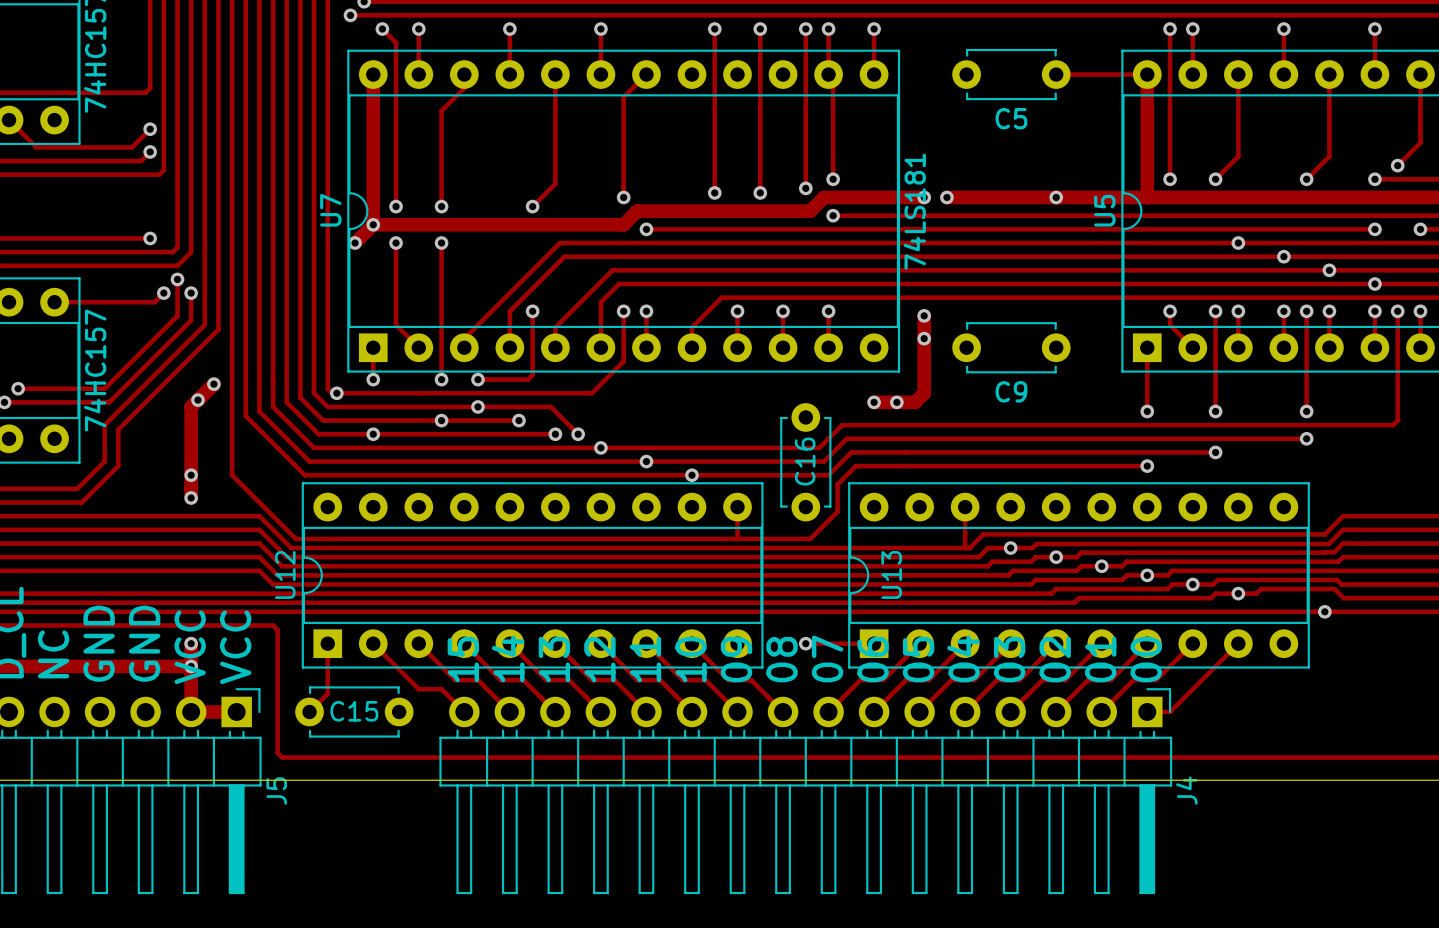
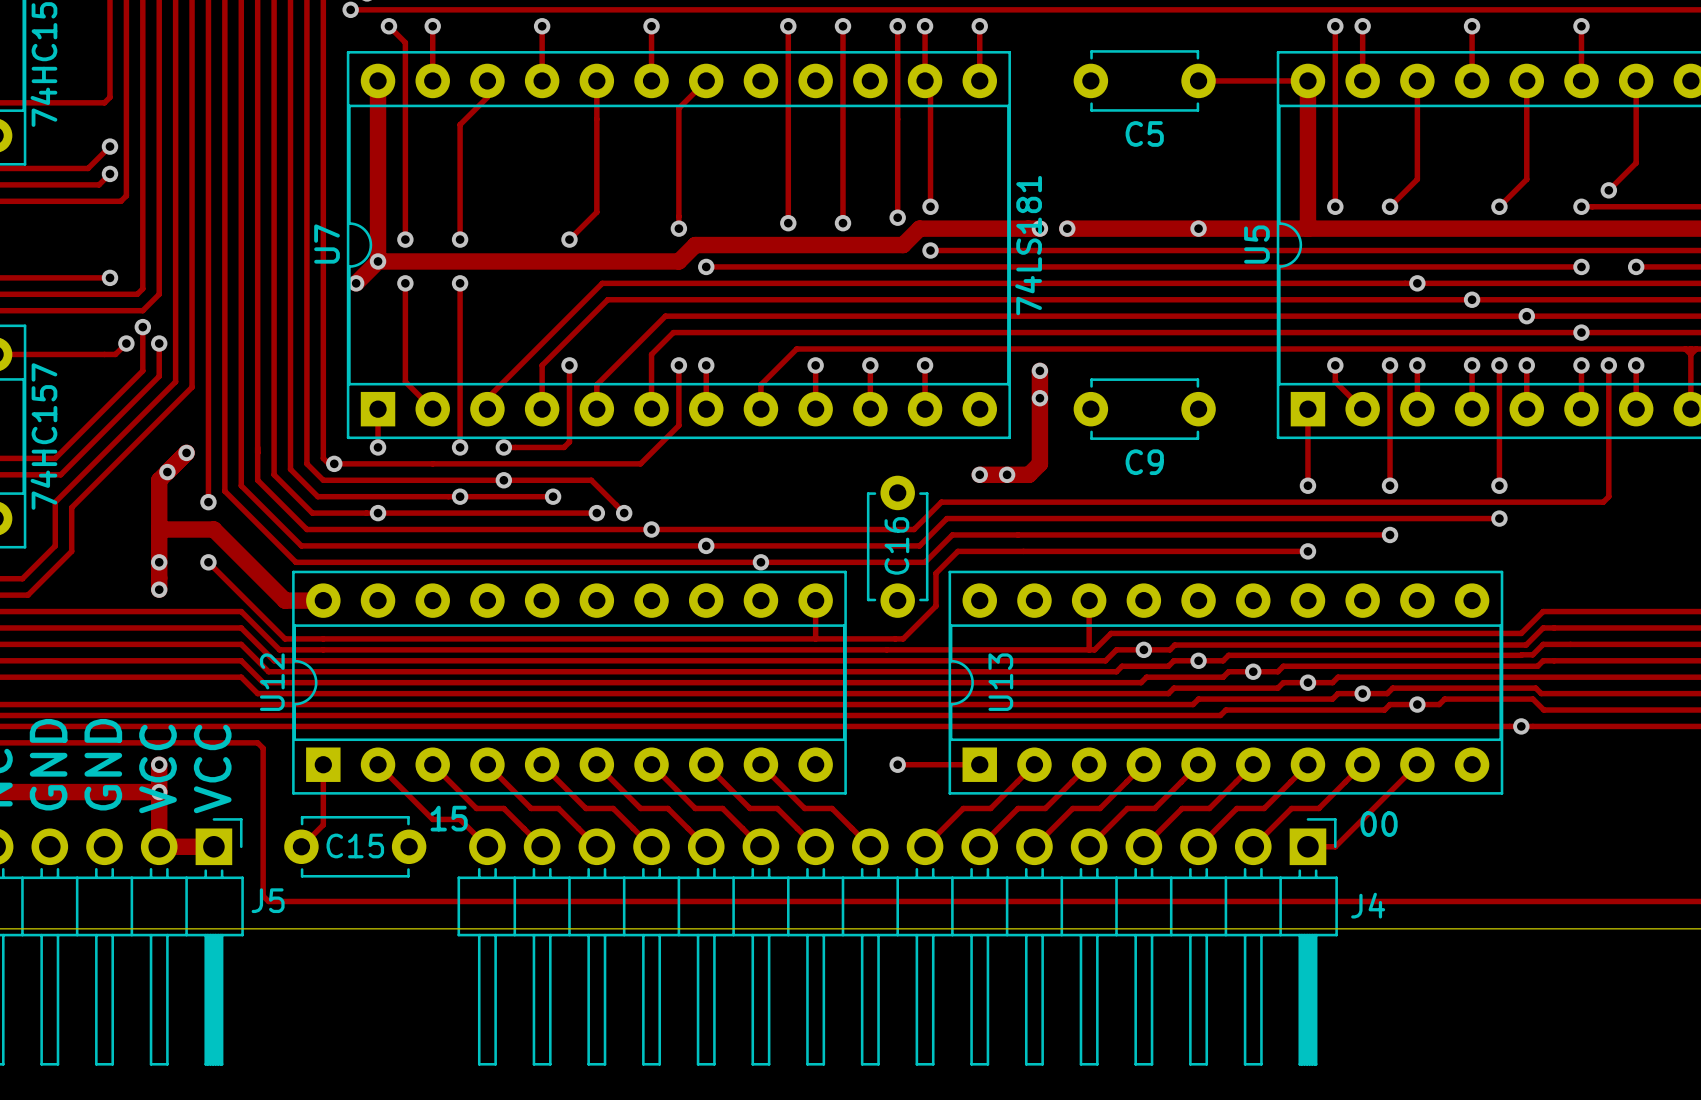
track: (232, 425) (232, 475) -> none
via: none -> (208, 502)
track: none -> (159, 529) (213, 529) (285, 600) (323, 600)
via: none -> (208, 562)
J4 footprint: [439, 688, 1173, 895] -> [457, 818, 1338, 1066]
J5 name rotation: 0° (276, 791) -> 90° clockwise (268, 900)

